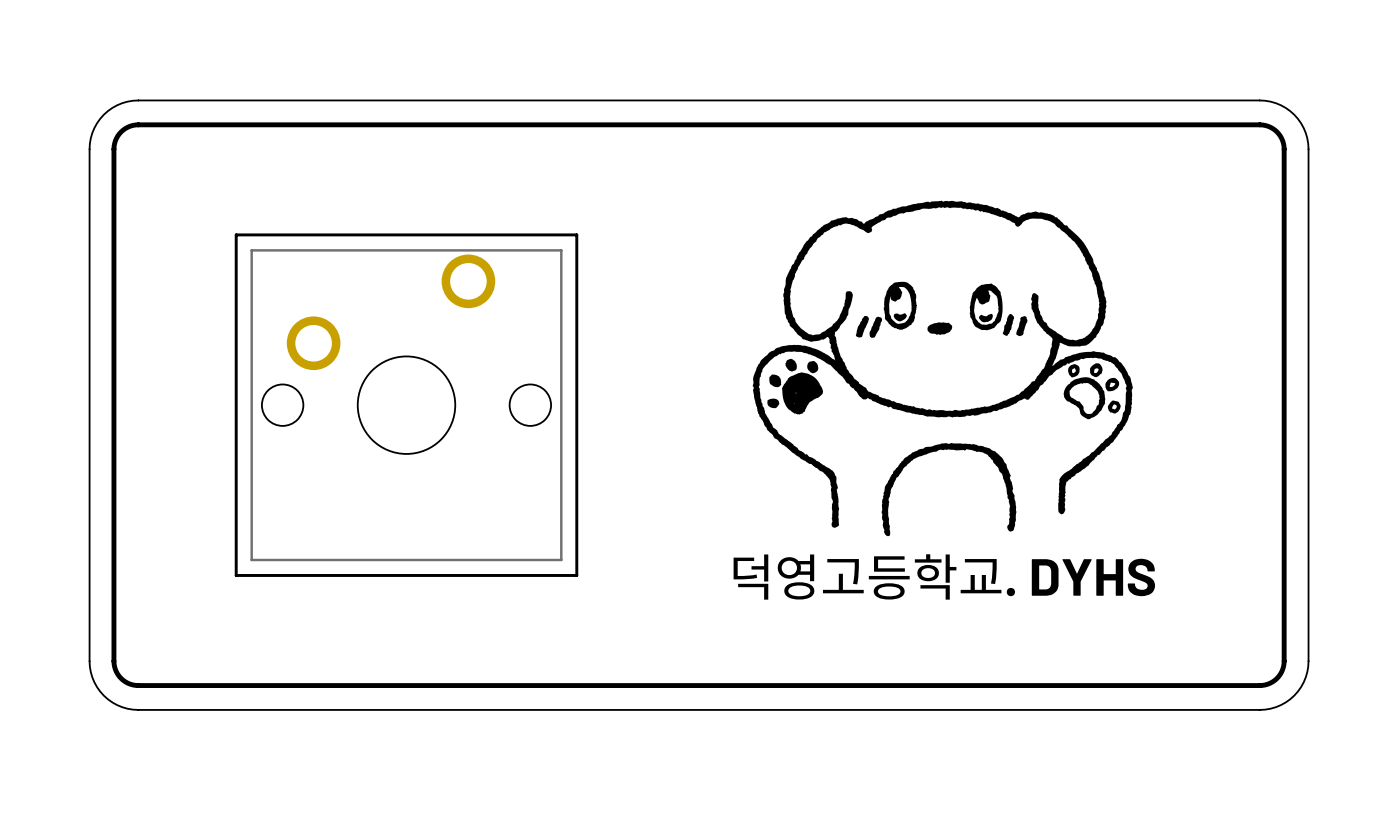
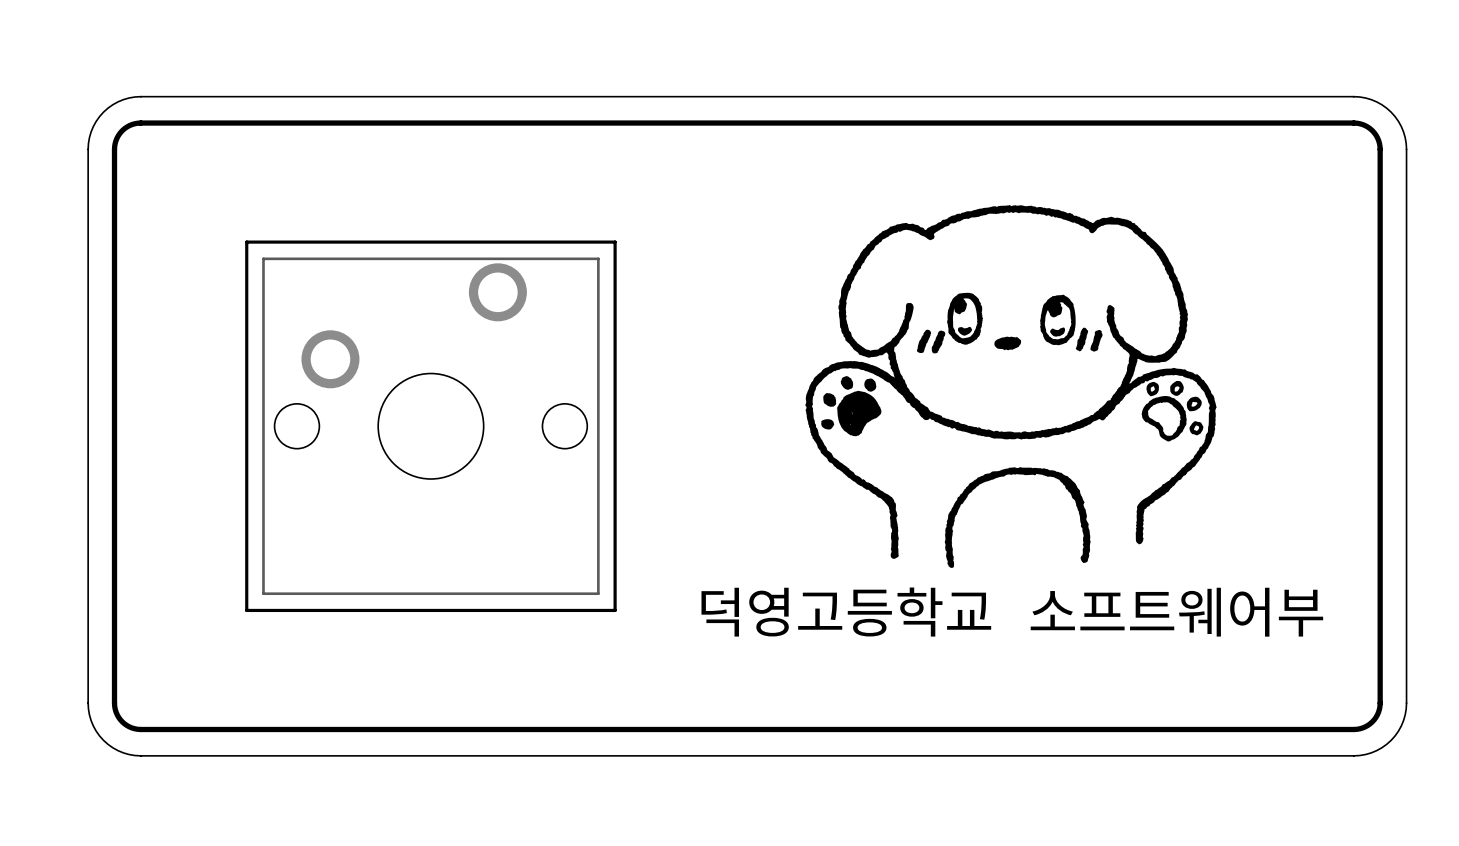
text: 덕영고등학교. DYHS (944, 576) -> 덕영고등학교 소프트웨어부 (1012, 612)

